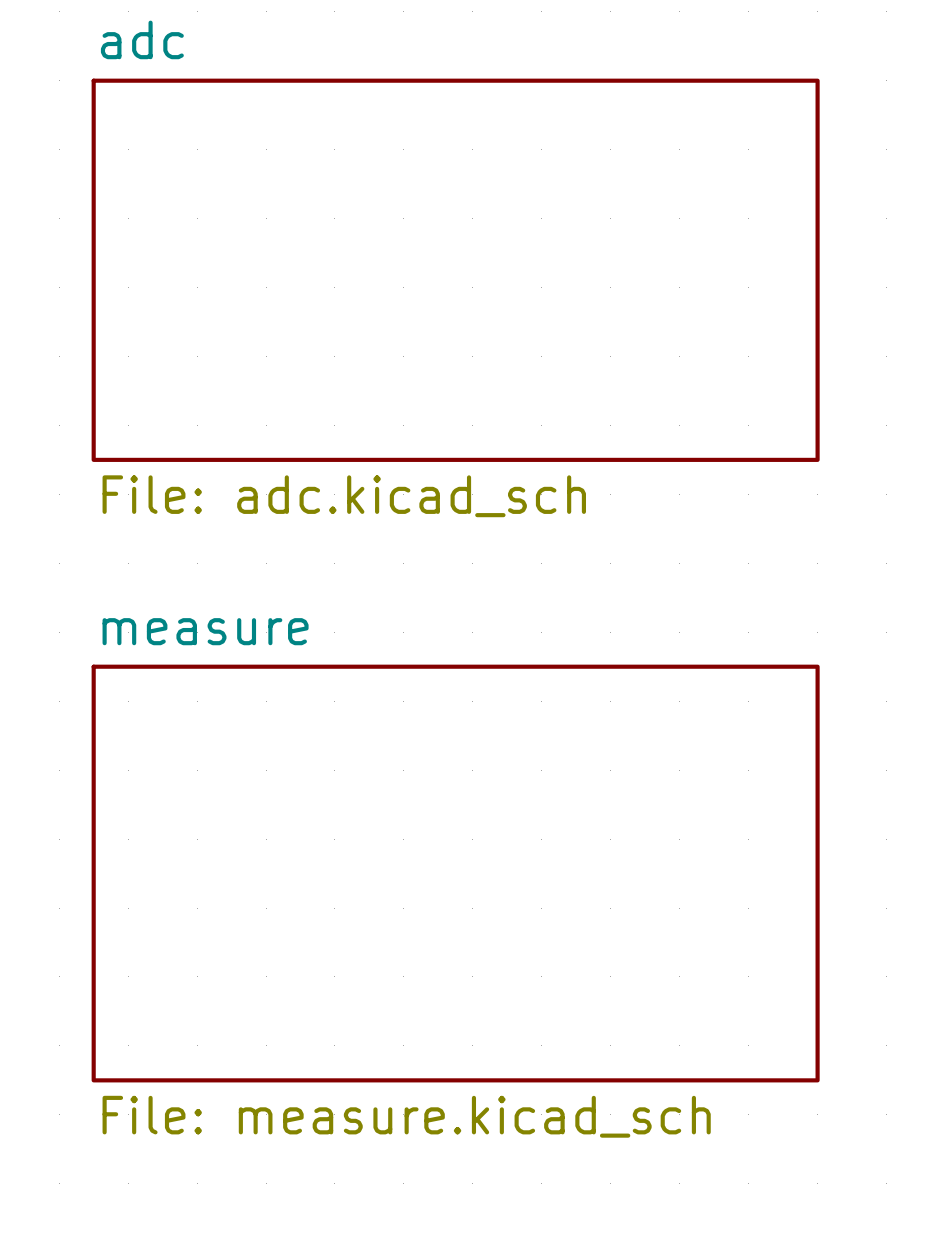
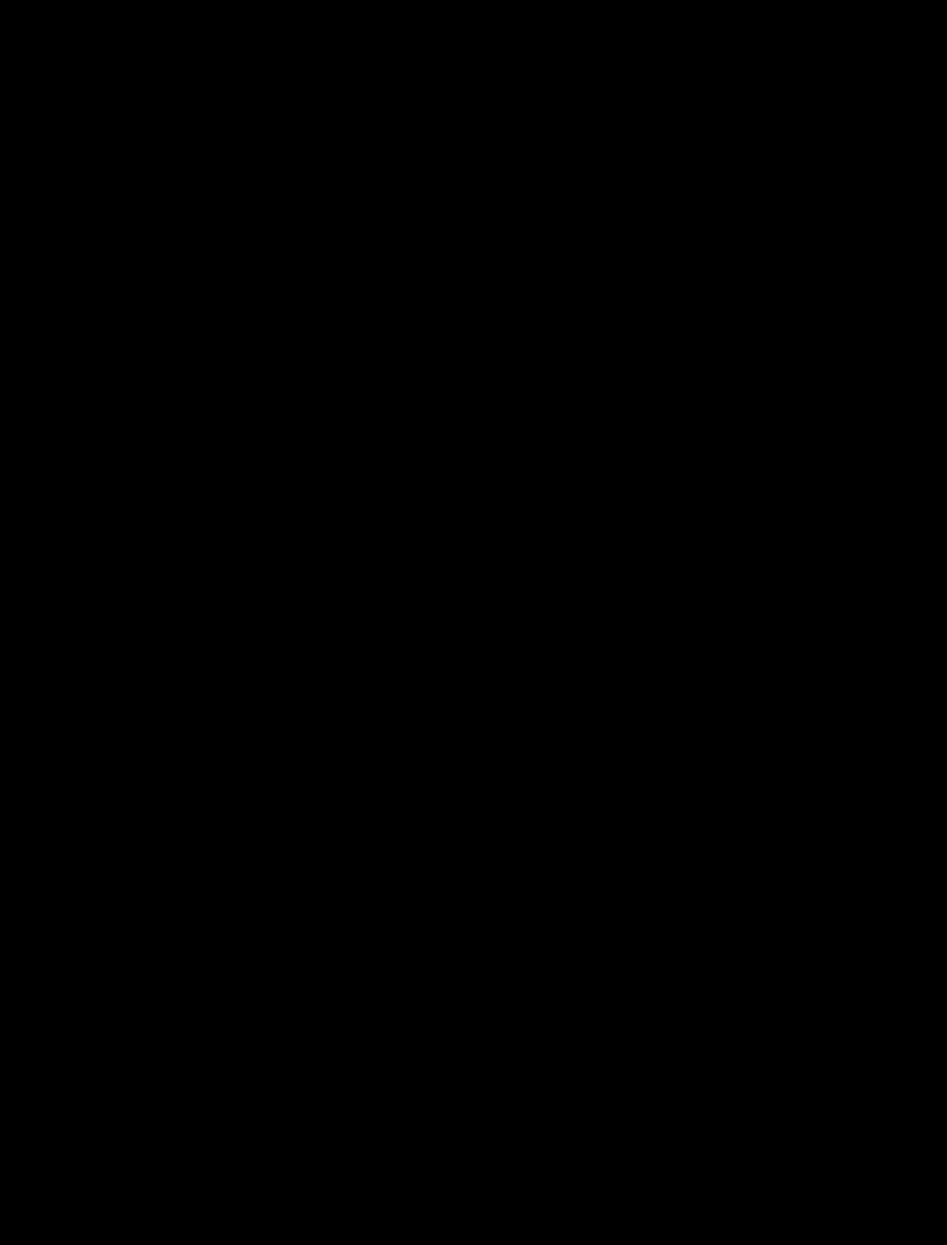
sheet adc: File: adc.kicad_sch (455, 270) -> none
sheet measure: File: measure.kicad_sch (455, 873) -> none

